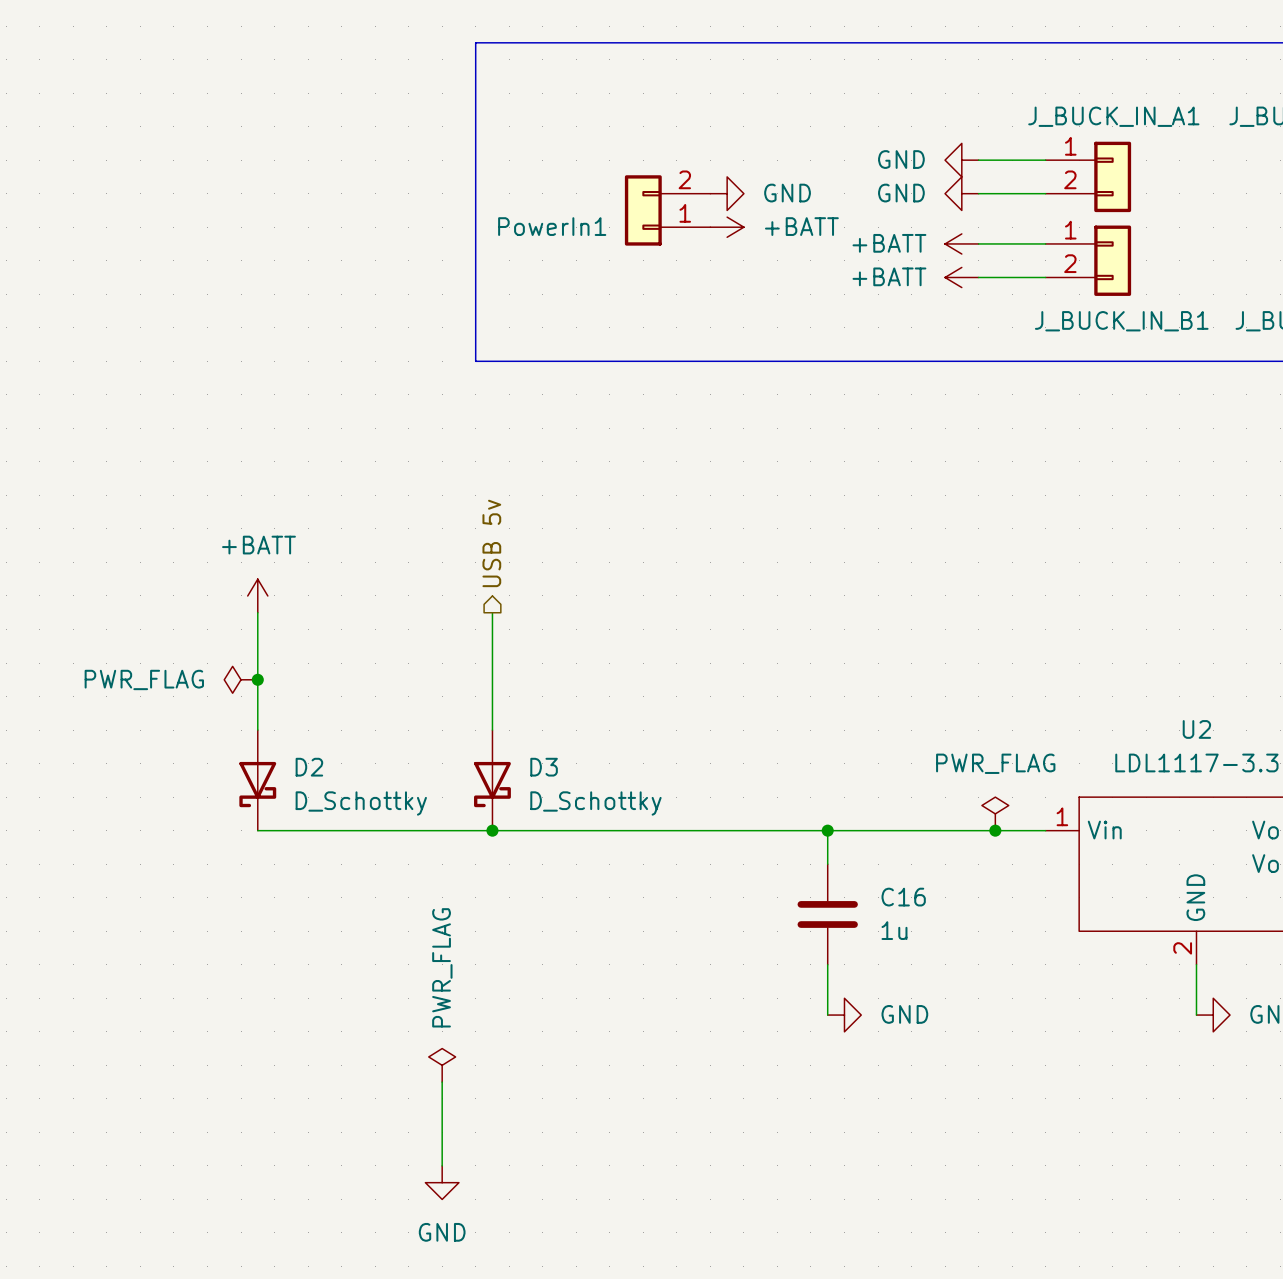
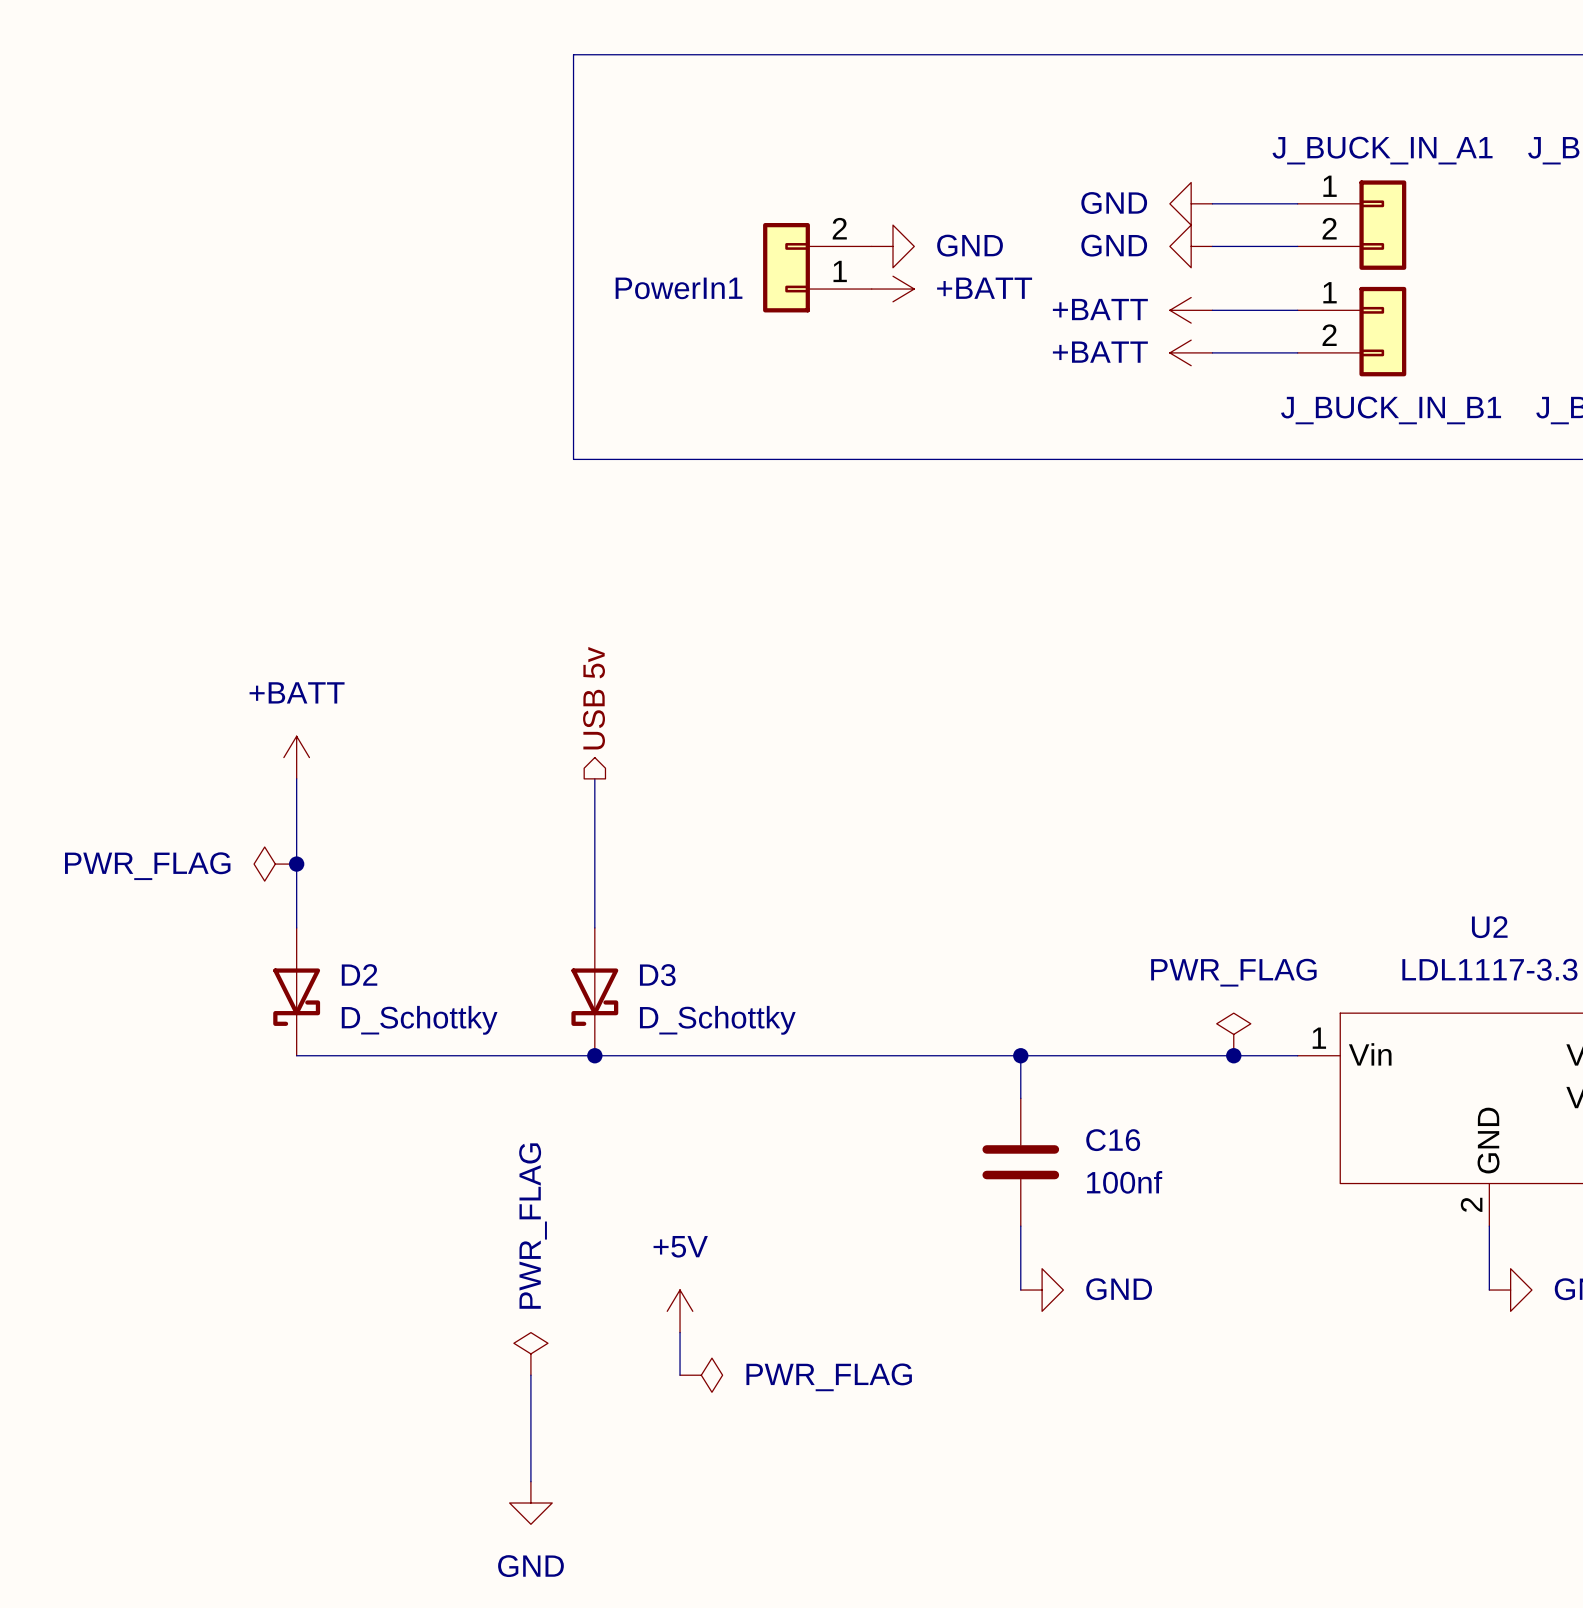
C16 value: 1u (894, 930) -> 100nf (1124, 1182)
power symbol: none -> +5V (680, 1311)
wire: none -> (680, 1332) (680, 1375)
power symbol: none -> PWR_FLAG (701, 1375)

